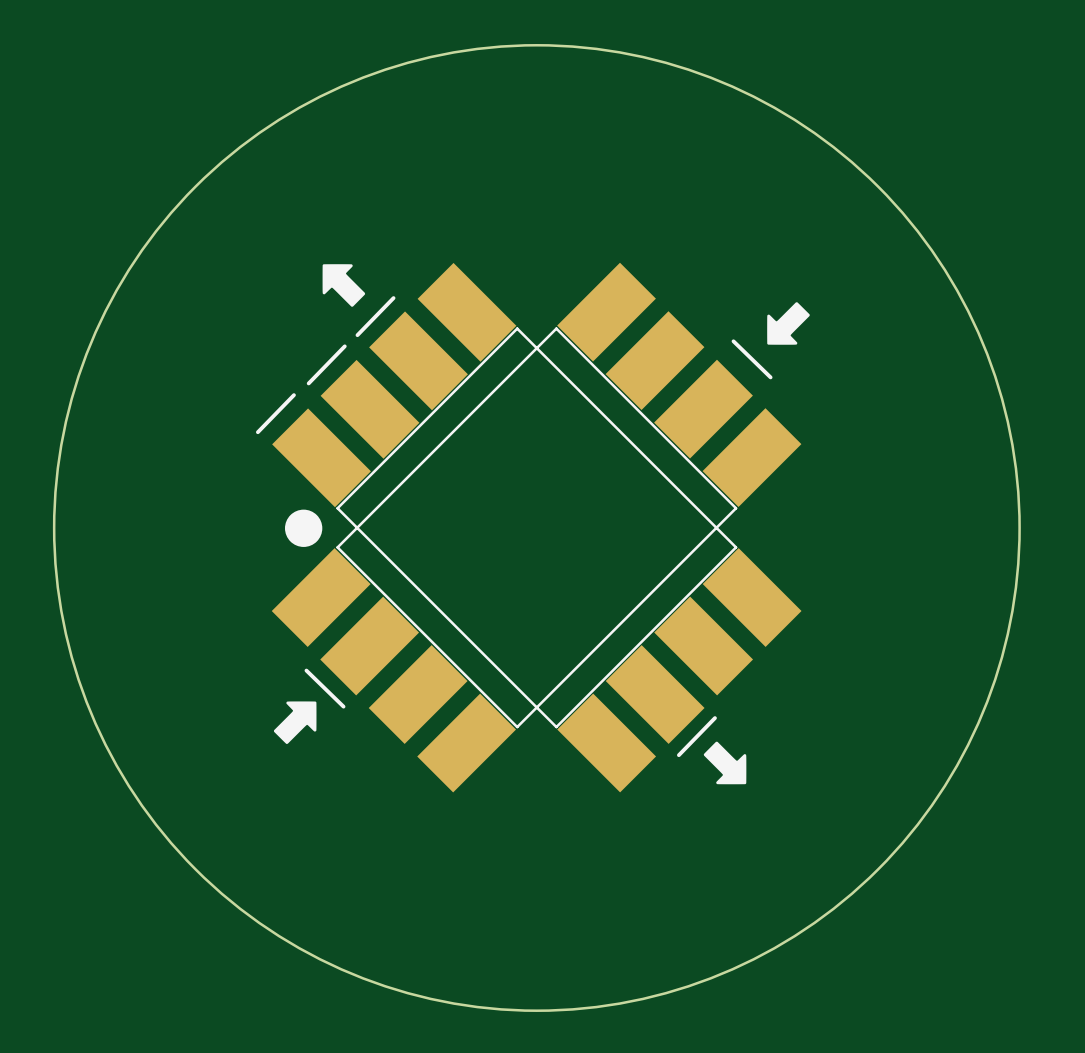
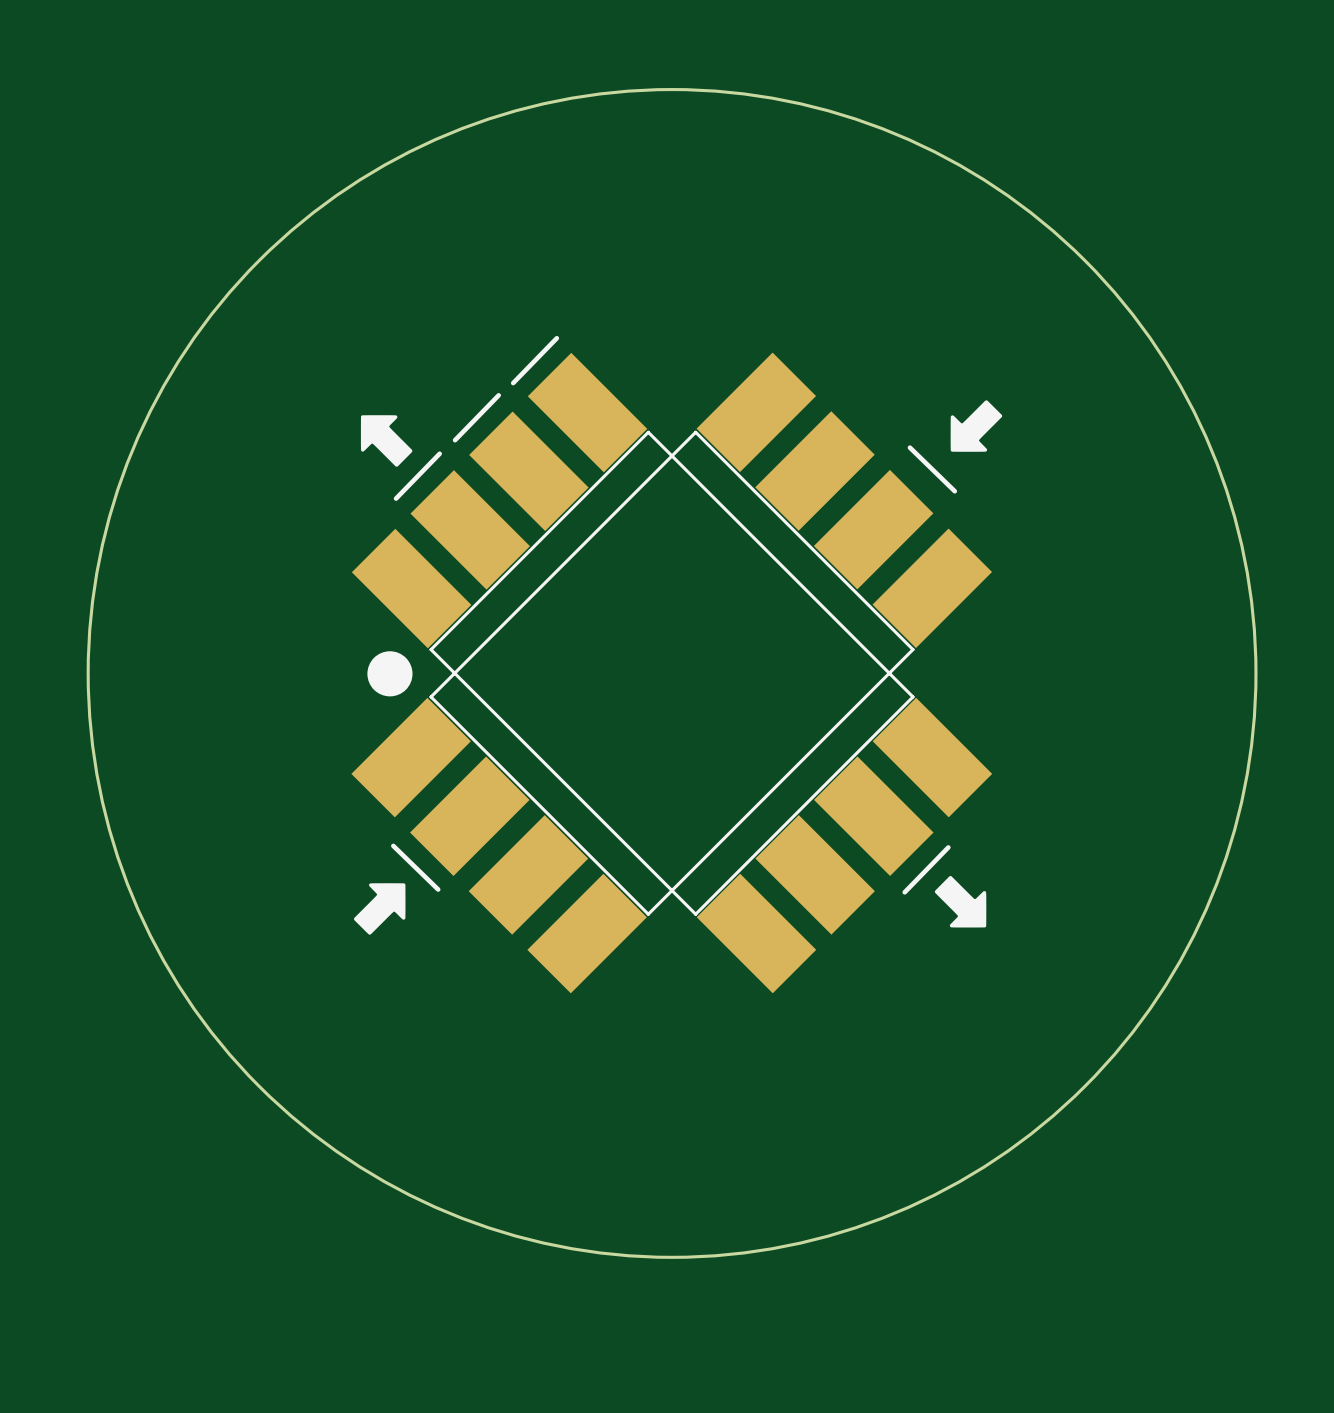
drawing position: (343, 285) -> (386, 440)
line: (293, 395) (257, 432) -> (556, 338) (513, 383)
line: (714, 718) (678, 755) -> (948, 847) (904, 892)
drawing position: (725, 762) -> (960, 901)

